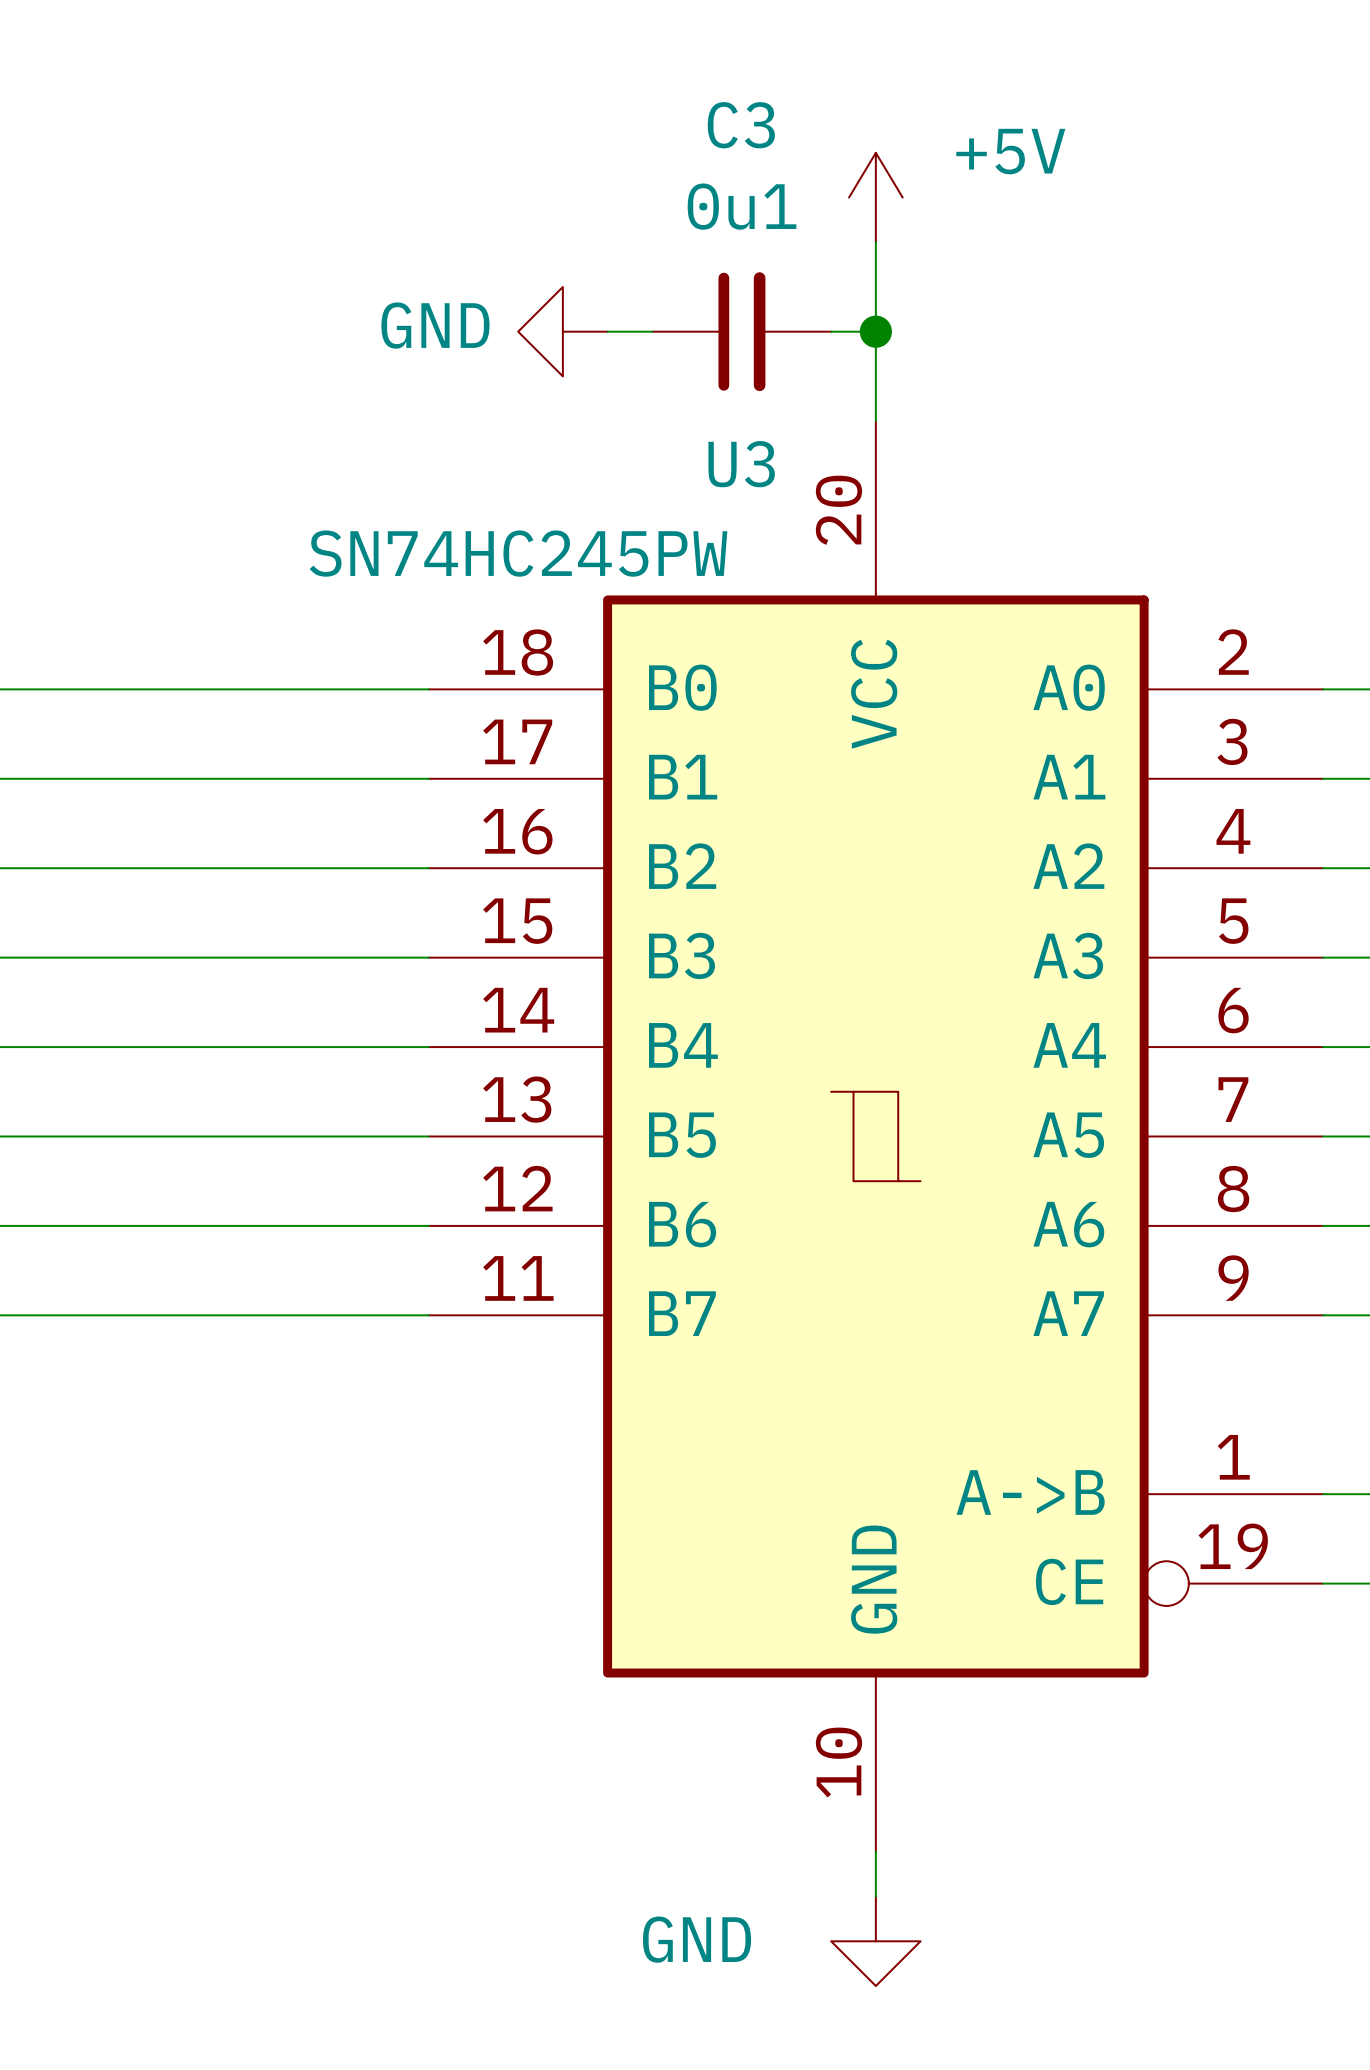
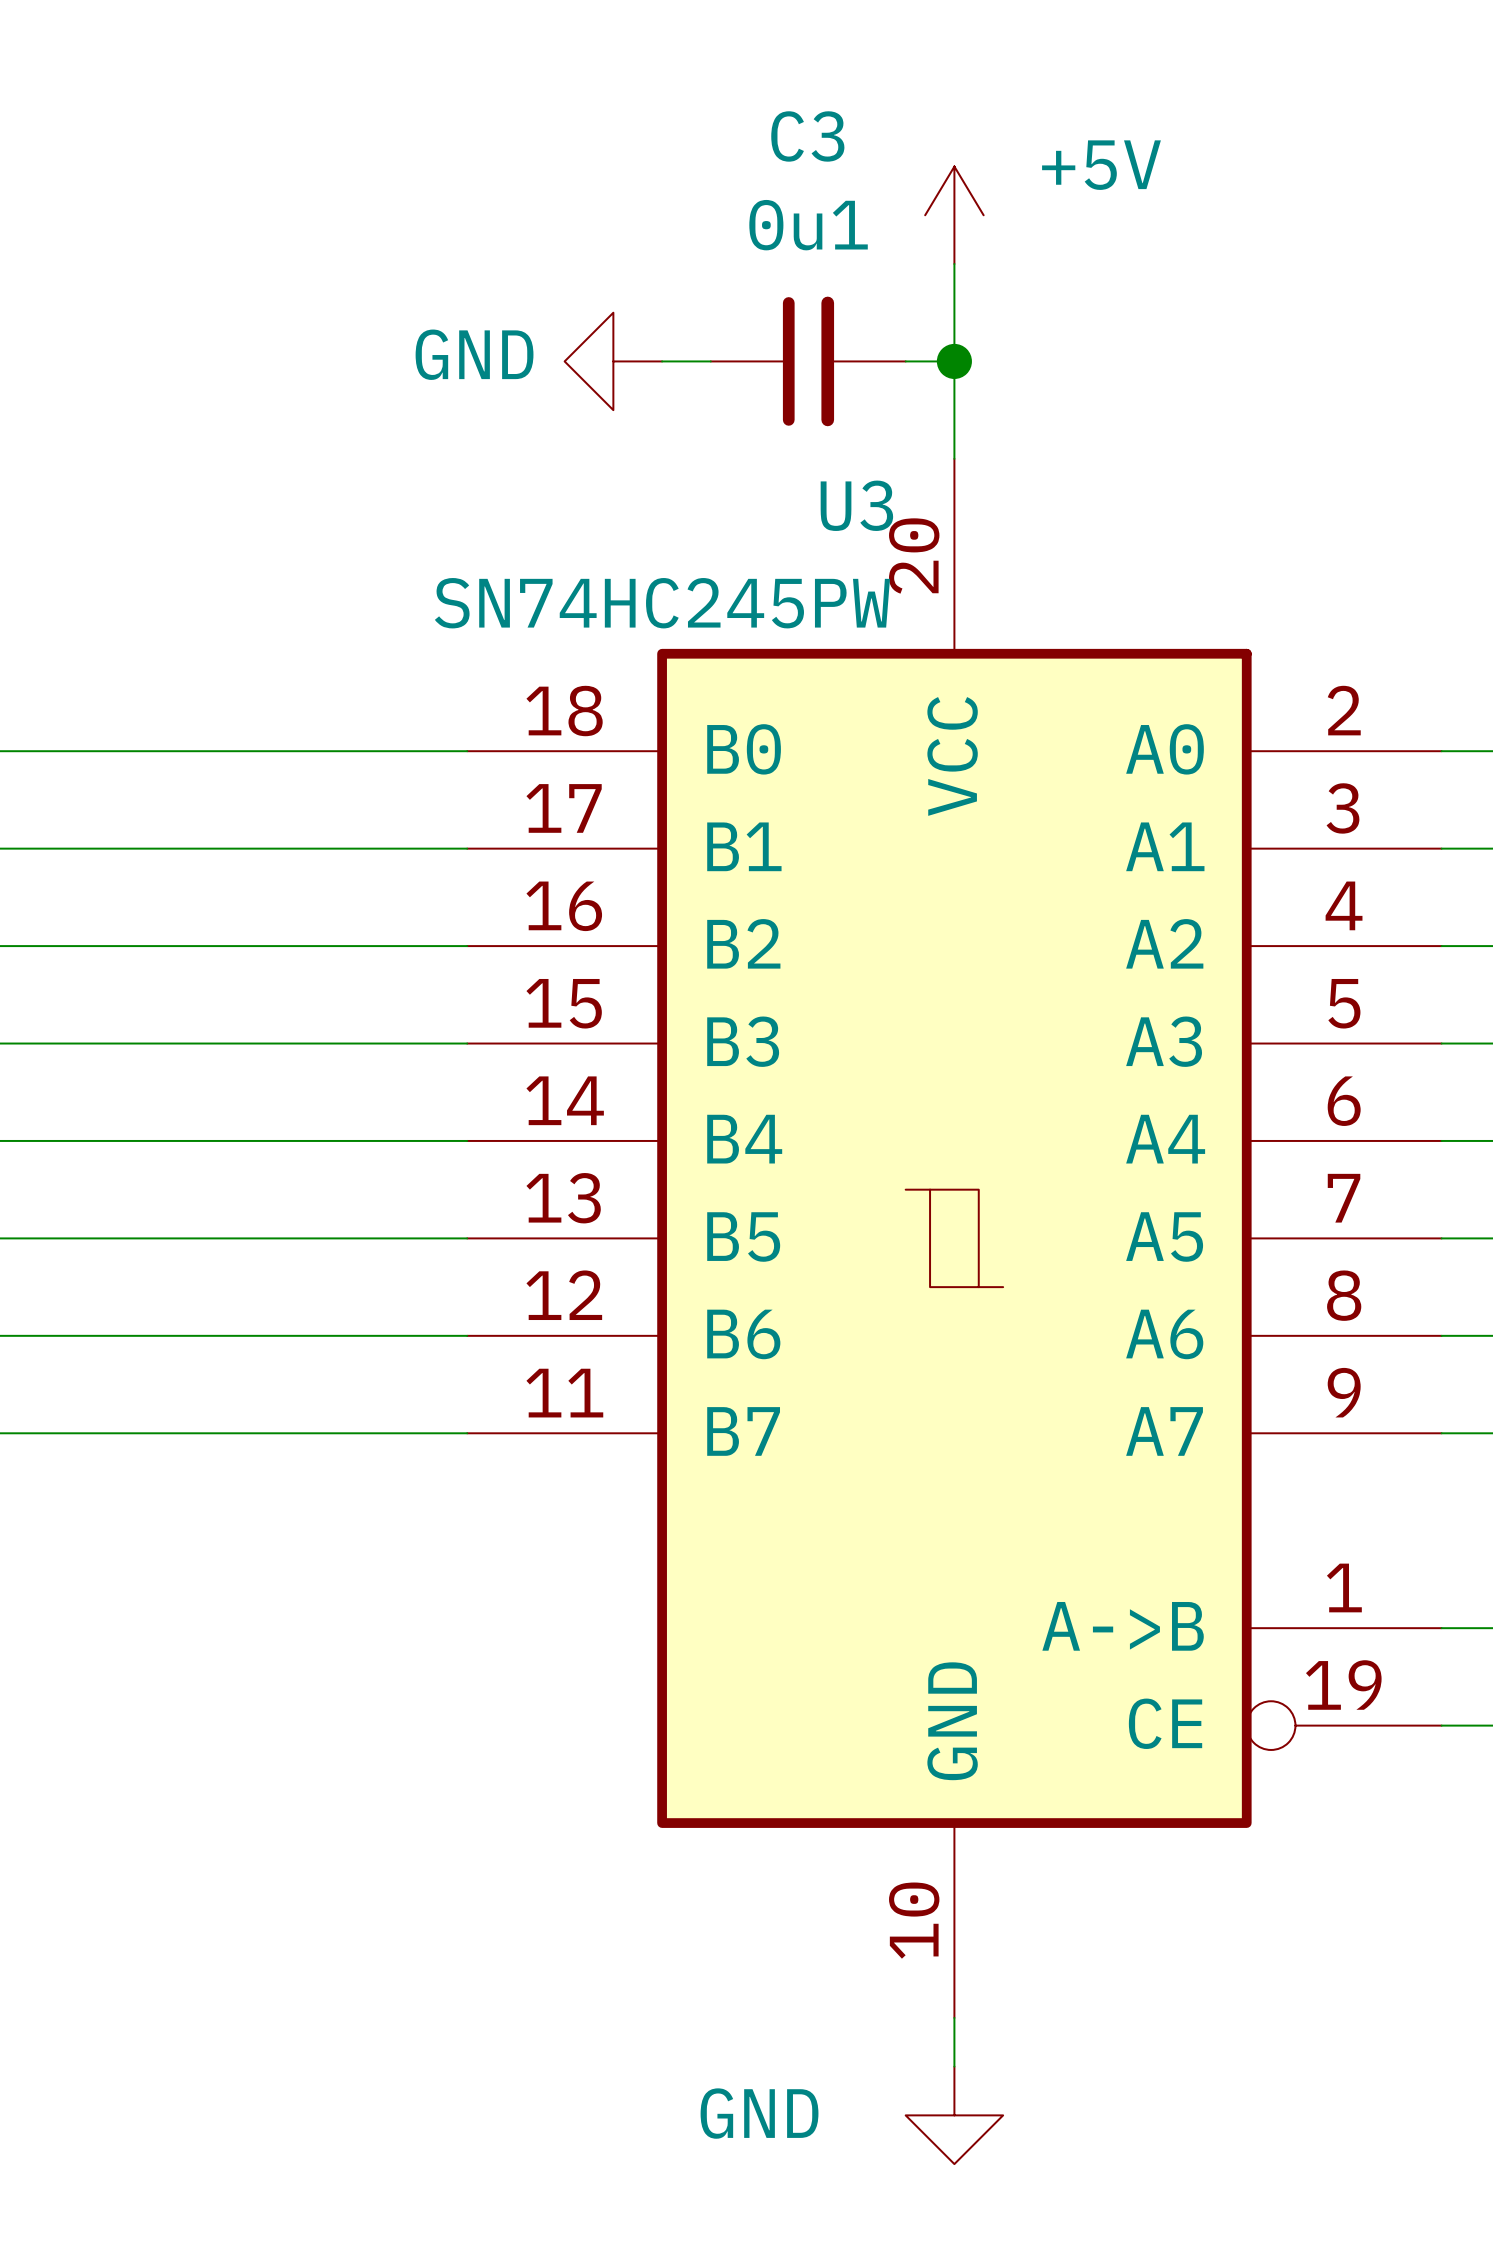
U3 name position: U3 (741, 464) -> U3 (856, 505)
U3 value position: SN74HC245PW (518, 553) -> SN74HC245PW (662, 603)

